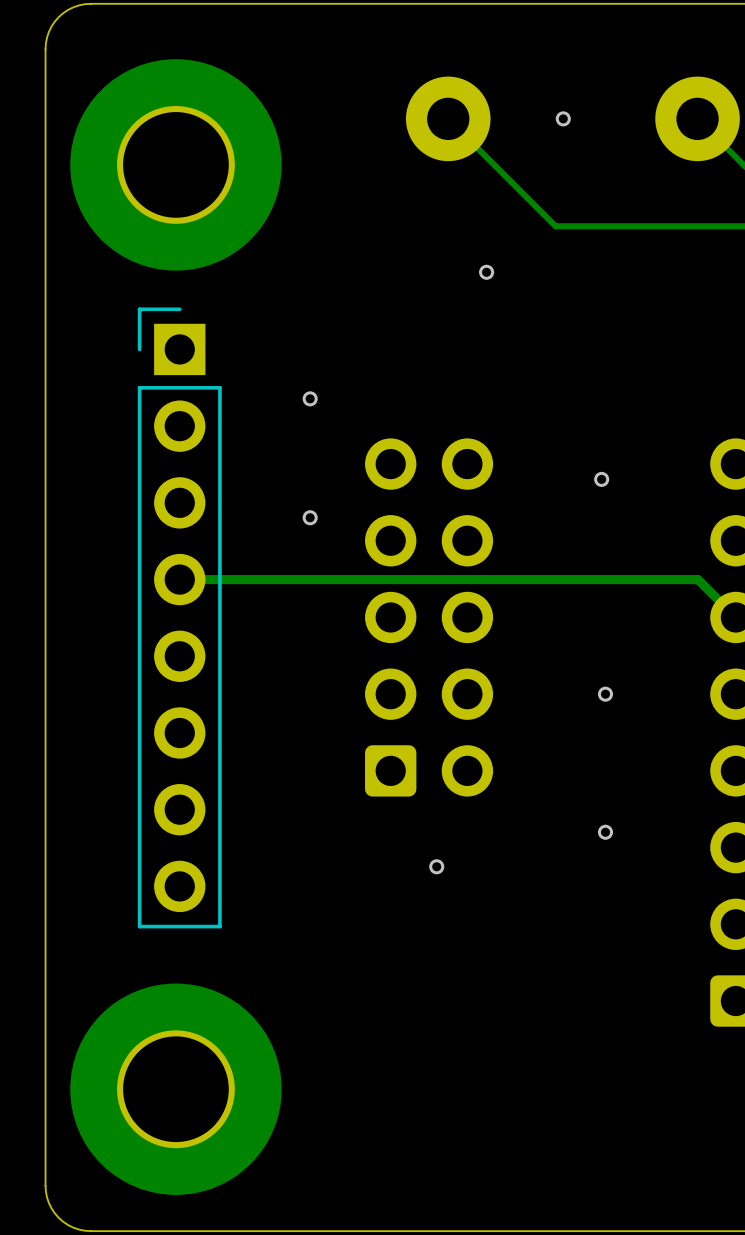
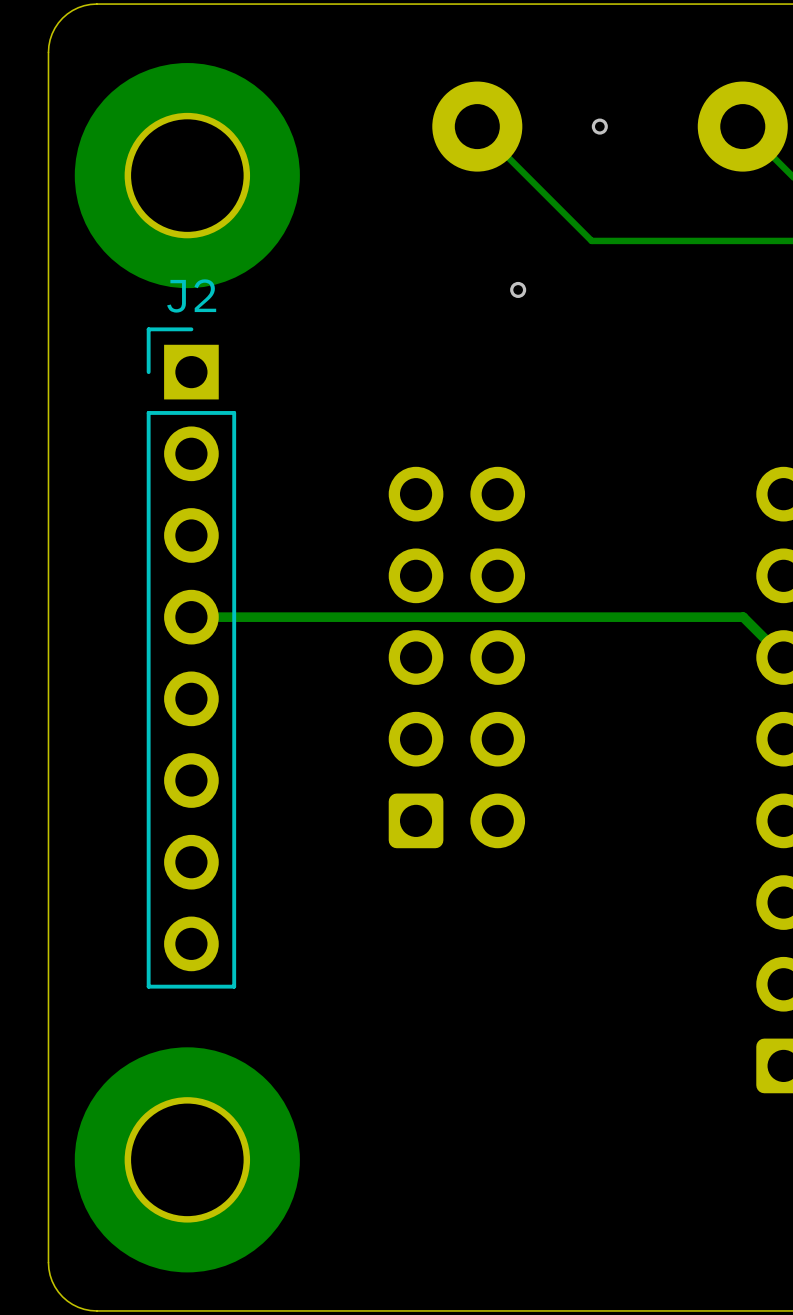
J2 name: none -> J2 (191, 295)
via: (310, 398) -> none
via: (601, 479) -> none
via: (310, 517) -> none
via: (605, 694) -> none
via: (605, 832) -> none
via: (436, 866) -> none

